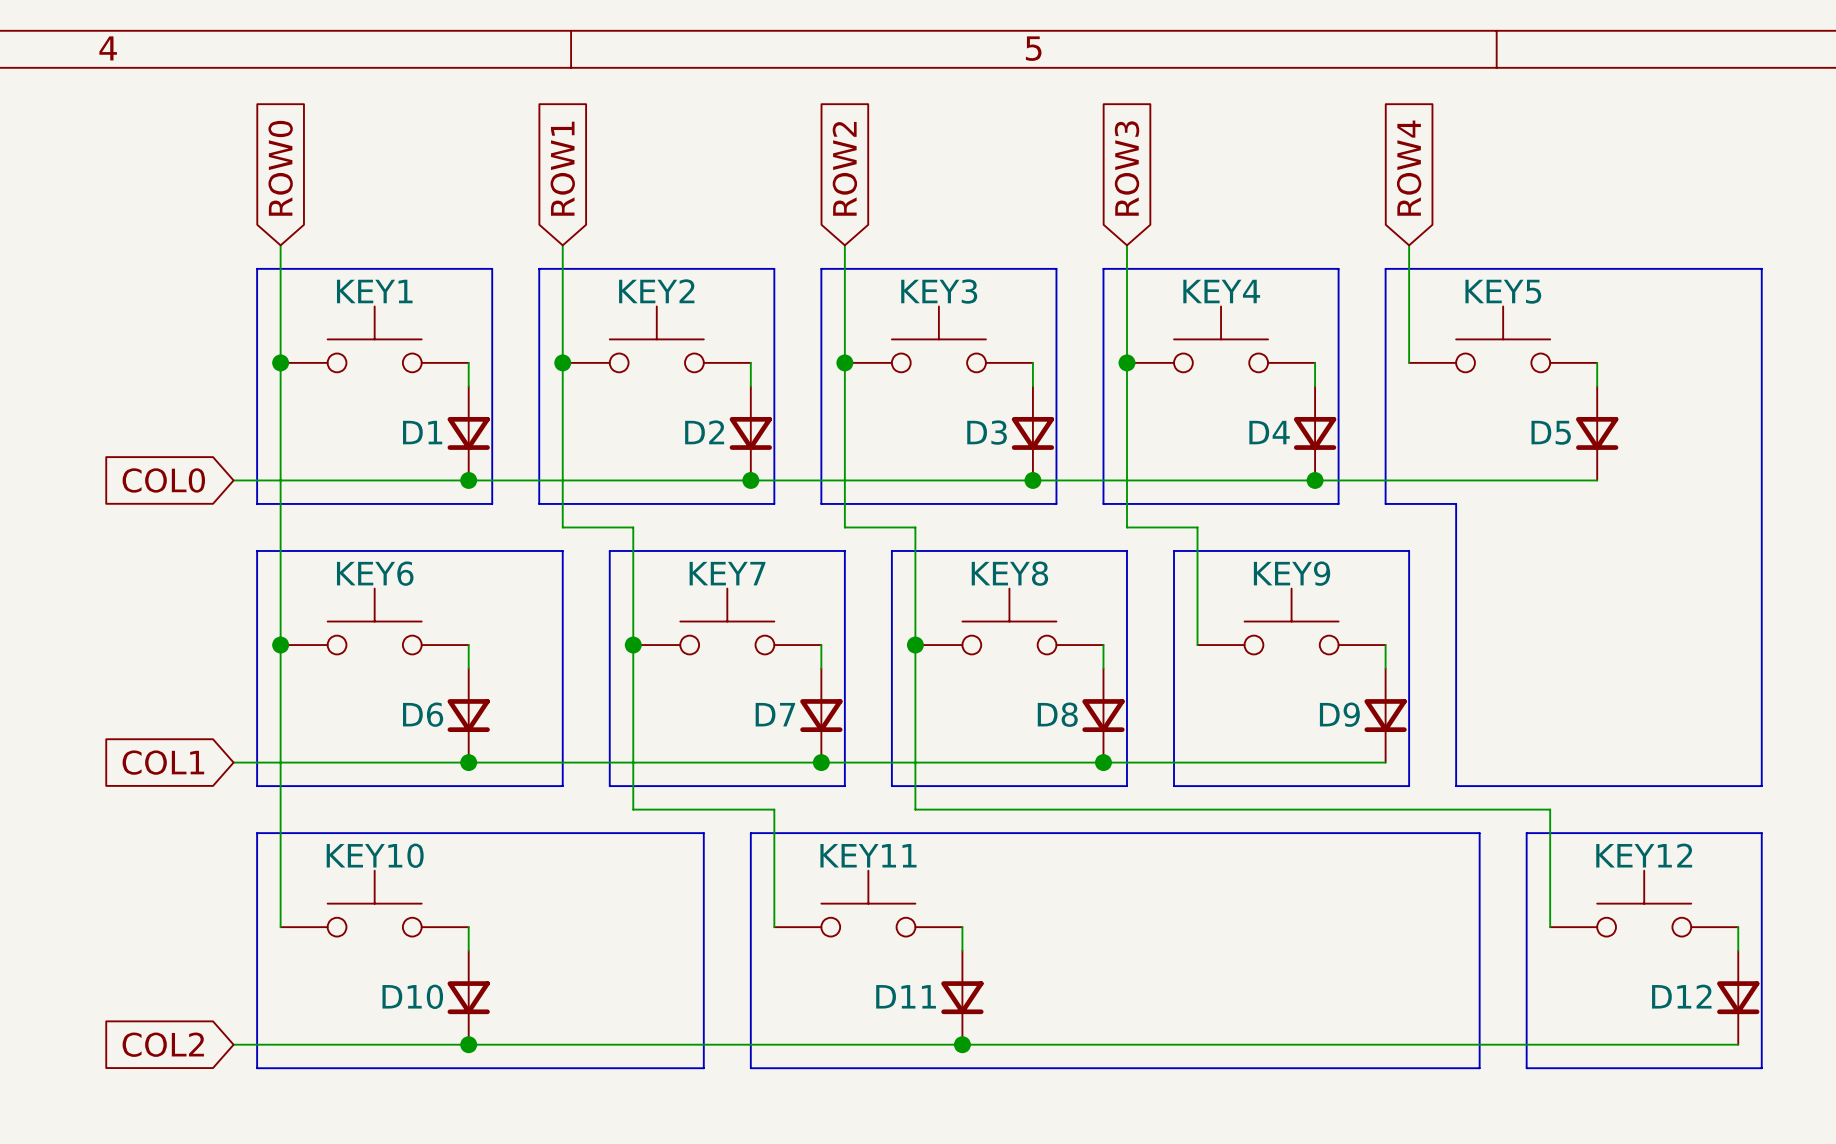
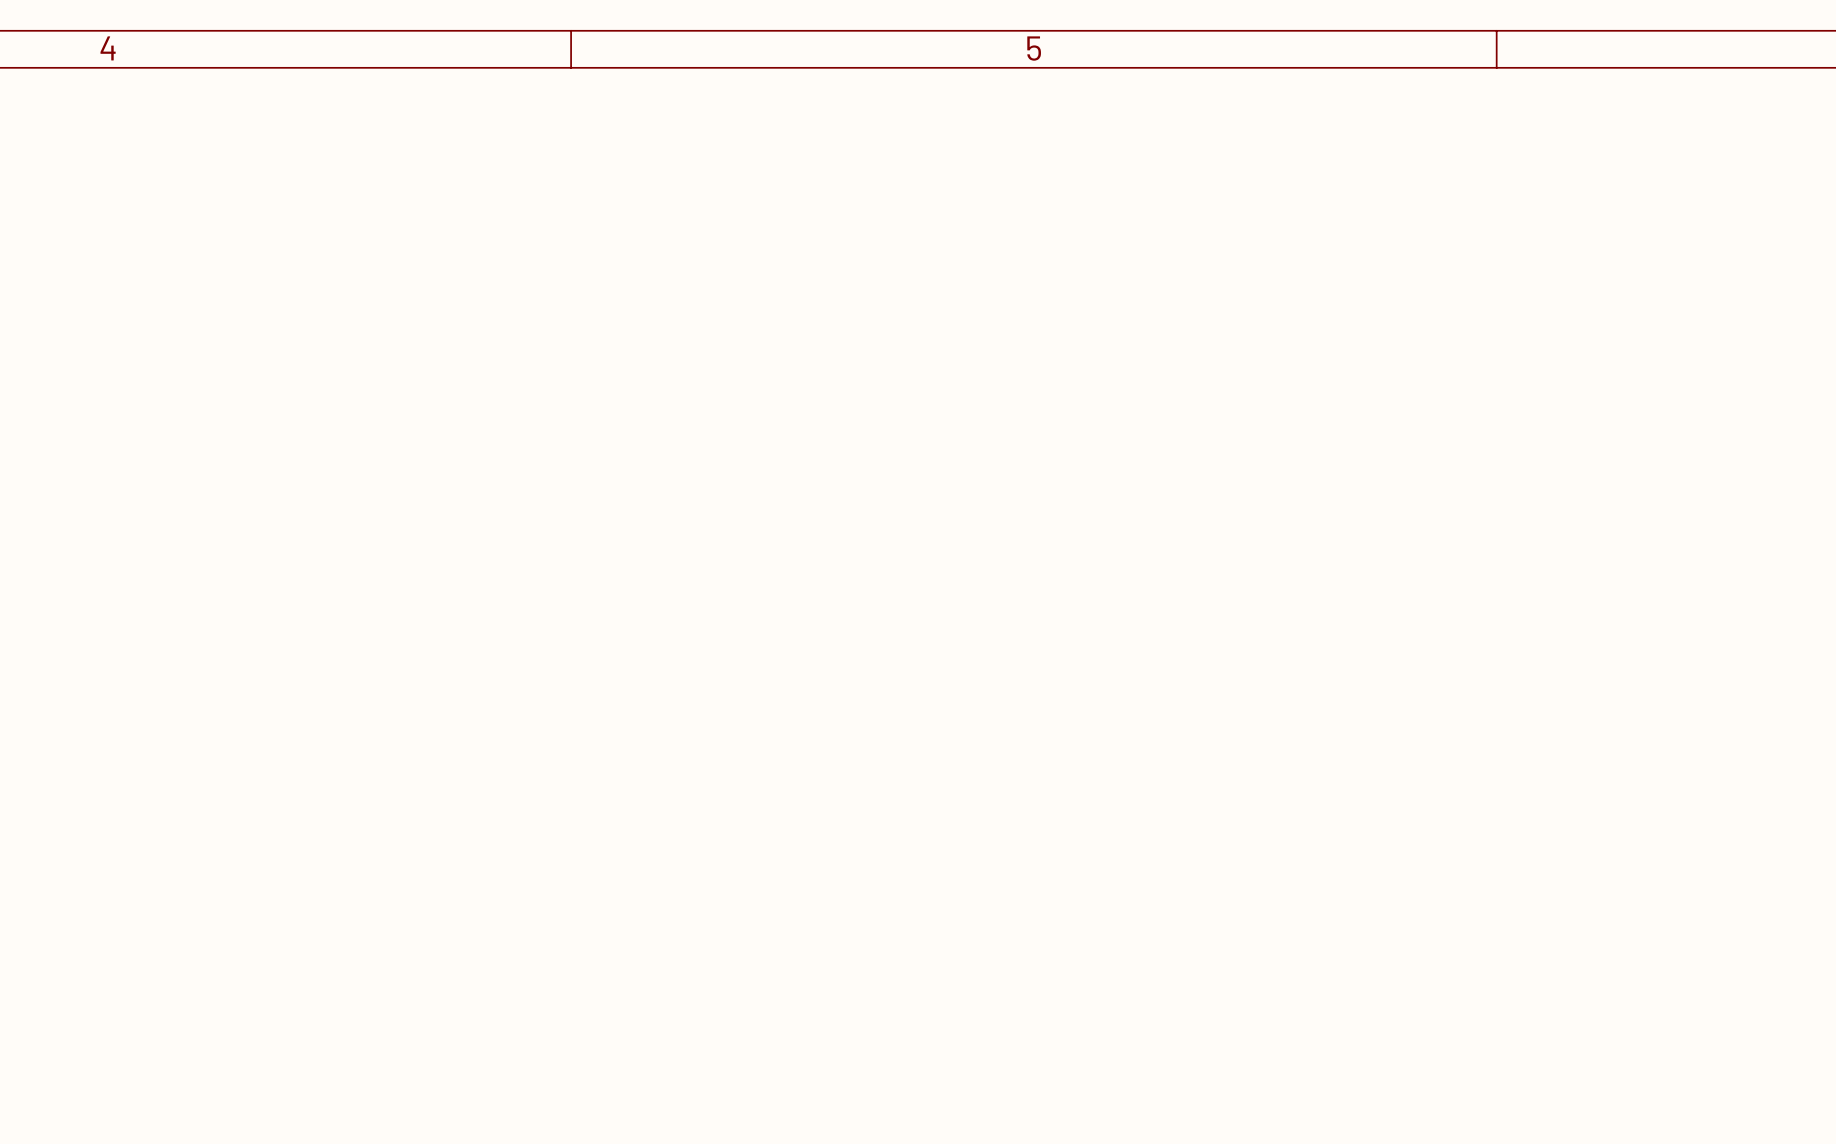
global label: ROW0 (280, 168) -> none
global label: ROW1 (562, 168) -> none
global label: ROW2 (844, 168) -> none
global label: ROW3 (1127, 168) -> none
global label: ROW4 (1409, 168) -> none
wire: (280, 245) (280, 927) -> none
wire: (562, 245) (562, 527) (633, 527) (633, 809) (774, 809) (774, 927) -> none
wire: (844, 245) (844, 527) (915, 527) (915, 809) (1550, 809) (1550, 927) -> none
wire: (1126, 245) (1126, 527) (1197, 527) (1197, 645) -> none
wire: (1409, 245) (1409, 362) -> none
line: (257, 268) (492, 268) (492, 503) (257, 503) (257, 268) -> none
line: (539, 268) (774, 268) (774, 503) (539, 503) (539, 268) -> none
line: (821, 268) (1056, 268) (1056, 503) (821, 503) (821, 268) -> none
line: (1103, 268) (1338, 268) (1338, 503) (1103, 503) (1103, 268) -> none
line: (1385, 268) (1761, 268) (1761, 786) (1456, 786) (1456, 503) (1385, 503) (1385, 268) -> none
KEY1: (374, 339) -> none
KEY2: (656, 339) -> none
KEY3: (938, 339) -> none
KEY4: (1221, 339) -> none
KEY5: (1503, 339) -> none
junction: (280, 362) -> none
wire: (468, 362) (468, 386) -> none
junction: (562, 362) -> none
wire: (750, 362) (750, 386) -> none
junction: (844, 362) -> none
wire: (1032, 362) (1032, 386) -> none
junction: (1126, 362) -> none
wire: (1315, 362) (1315, 386) -> none
wire: (1597, 362) (1597, 386) -> none
D1: (468, 433) -> none
D2: (750, 433) -> none
D3: (1032, 433) -> none
D4: (1315, 433) -> none
D5: (1597, 433) -> none
global label: COL0 (163, 480) -> none
wire: (233, 480) (1597, 480) -> none
junction: (468, 480) -> none
junction: (750, 480) -> none
junction: (1032, 480) -> none
junction: (1315, 480) -> none
line: (257, 550) (562, 550) (562, 786) (257, 786) (257, 550) -> none
line: (609, 550) (844, 550) (844, 786) (609, 786) (609, 550) -> none
line: (891, 550) (1126, 550) (1126, 786) (891, 786) (891, 550) -> none
line: (1174, 550) (1409, 550) (1409, 786) (1174, 786) (1174, 550) -> none
KEY6: (374, 621) -> none
KEY7: (727, 621) -> none
KEY8: (1009, 621) -> none
KEY9: (1291, 621) -> none
junction: (280, 645) -> none
wire: (468, 645) (468, 668) -> none
junction: (633, 645) -> none
wire: (821, 645) (821, 668) -> none
junction: (915, 645) -> none
wire: (1103, 645) (1103, 668) -> none
wire: (1385, 645) (1385, 668) -> none
D6: (468, 715) -> none
D7: (821, 715) -> none
D8: (1103, 715) -> none
D9: (1385, 715) -> none
global label: COL1 (163, 762) -> none
wire: (233, 762) (1385, 762) -> none
junction: (468, 762) -> none
junction: (821, 762) -> none
junction: (1103, 762) -> none
line: (257, 833) (703, 833) (703, 1068) (257, 1068) (257, 833) -> none
line: (750, 833) (1479, 833) (1479, 1068) (750, 1068) (750, 833) -> none
line: (1526, 833) (1761, 833) (1761, 1068) (1526, 1068) (1526, 833) -> none
KEY10: (374, 903) -> none
KEY11: (868, 903) -> none
KEY12: (1644, 903) -> none
wire: (468, 927) (468, 950) -> none
wire: (962, 927) (962, 950) -> none
wire: (1738, 927) (1738, 950) -> none
D10: (468, 997) -> none
D11: (962, 997) -> none
D12: (1738, 997) -> none
global label: COL2 (163, 1044) -> none
wire: (233, 1044) (1738, 1044) -> none
junction: (468, 1044) -> none
junction: (962, 1044) -> none

